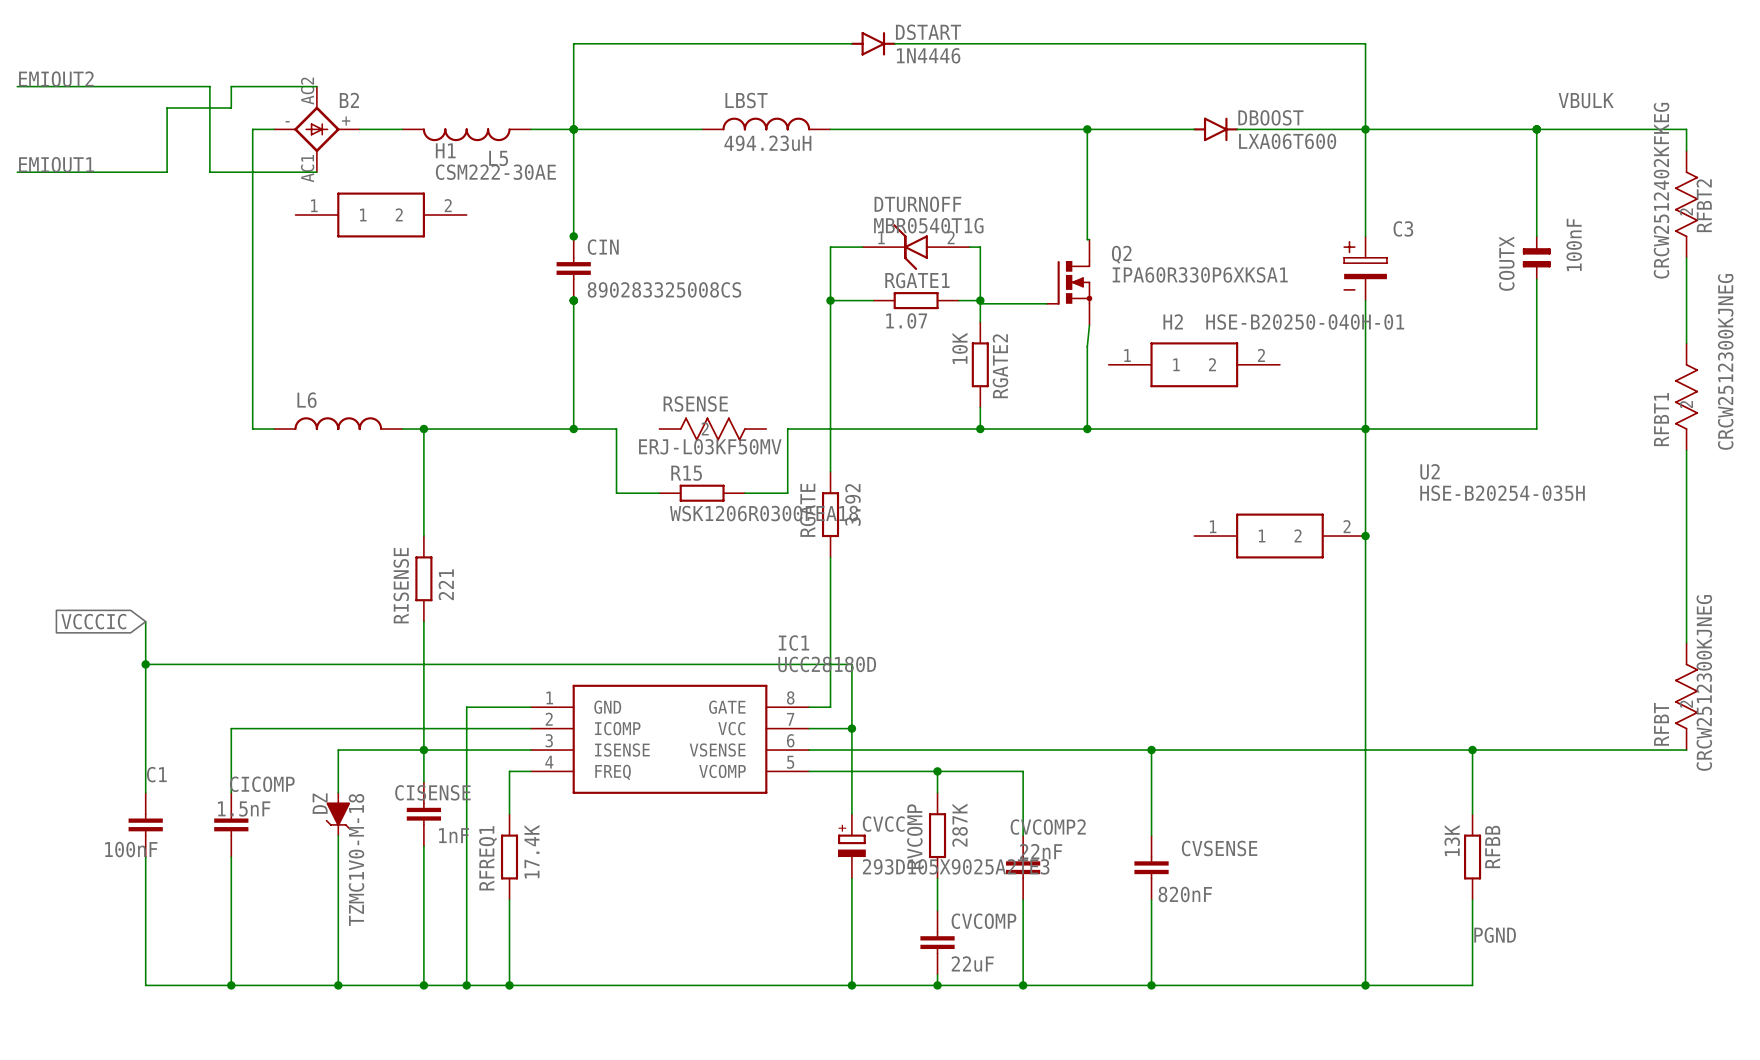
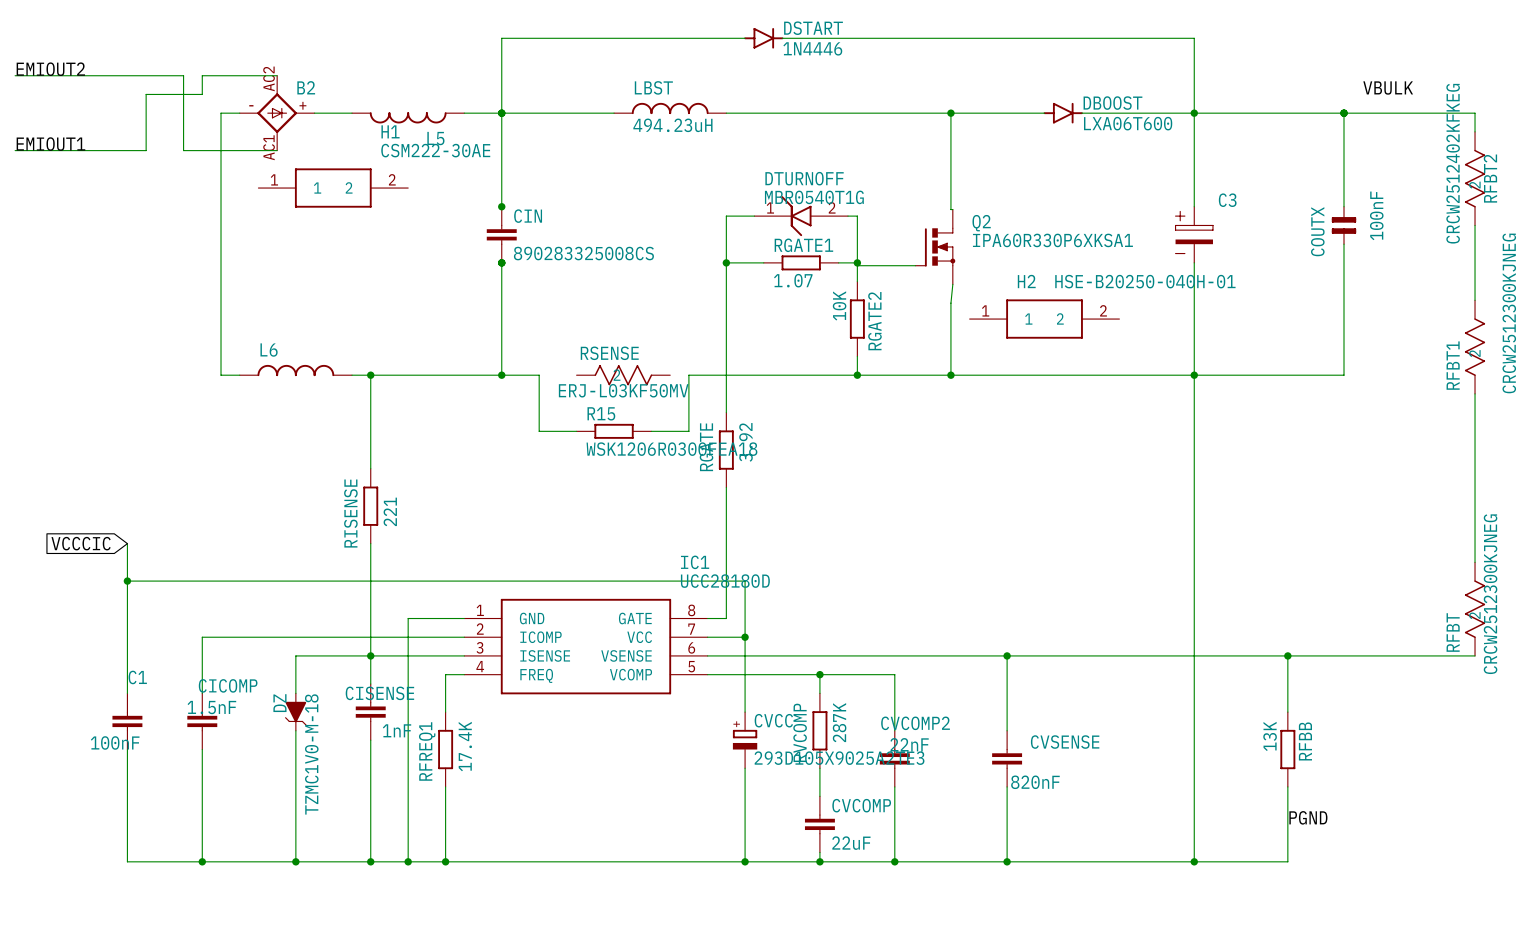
U2: HSE-B20254-035H (1279, 536) -> none
junction: (1365, 536) -> none

